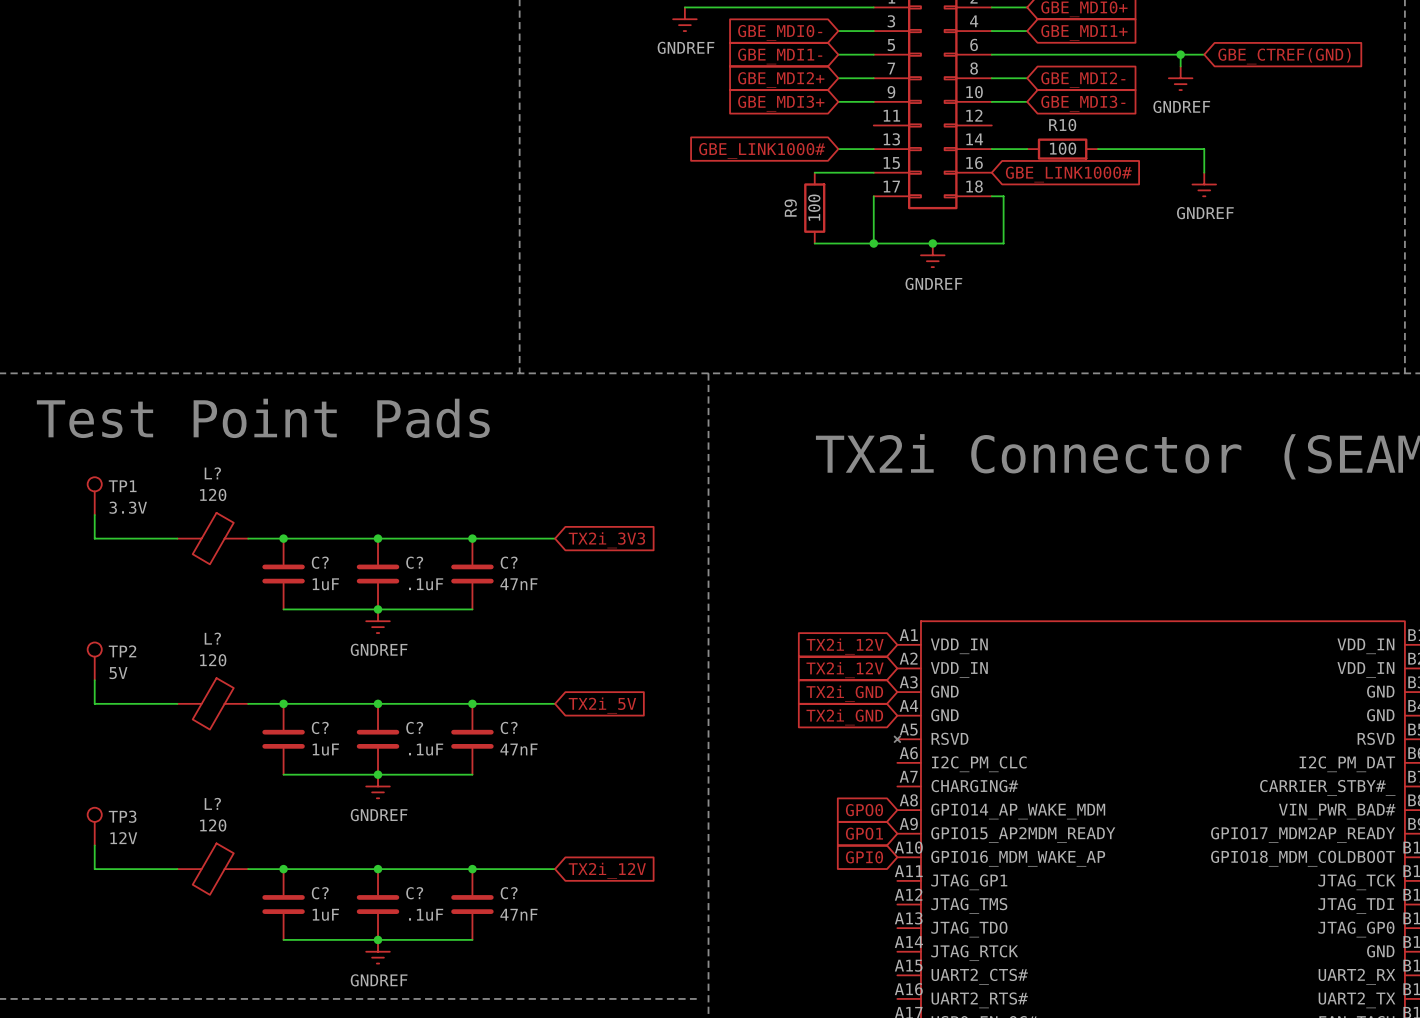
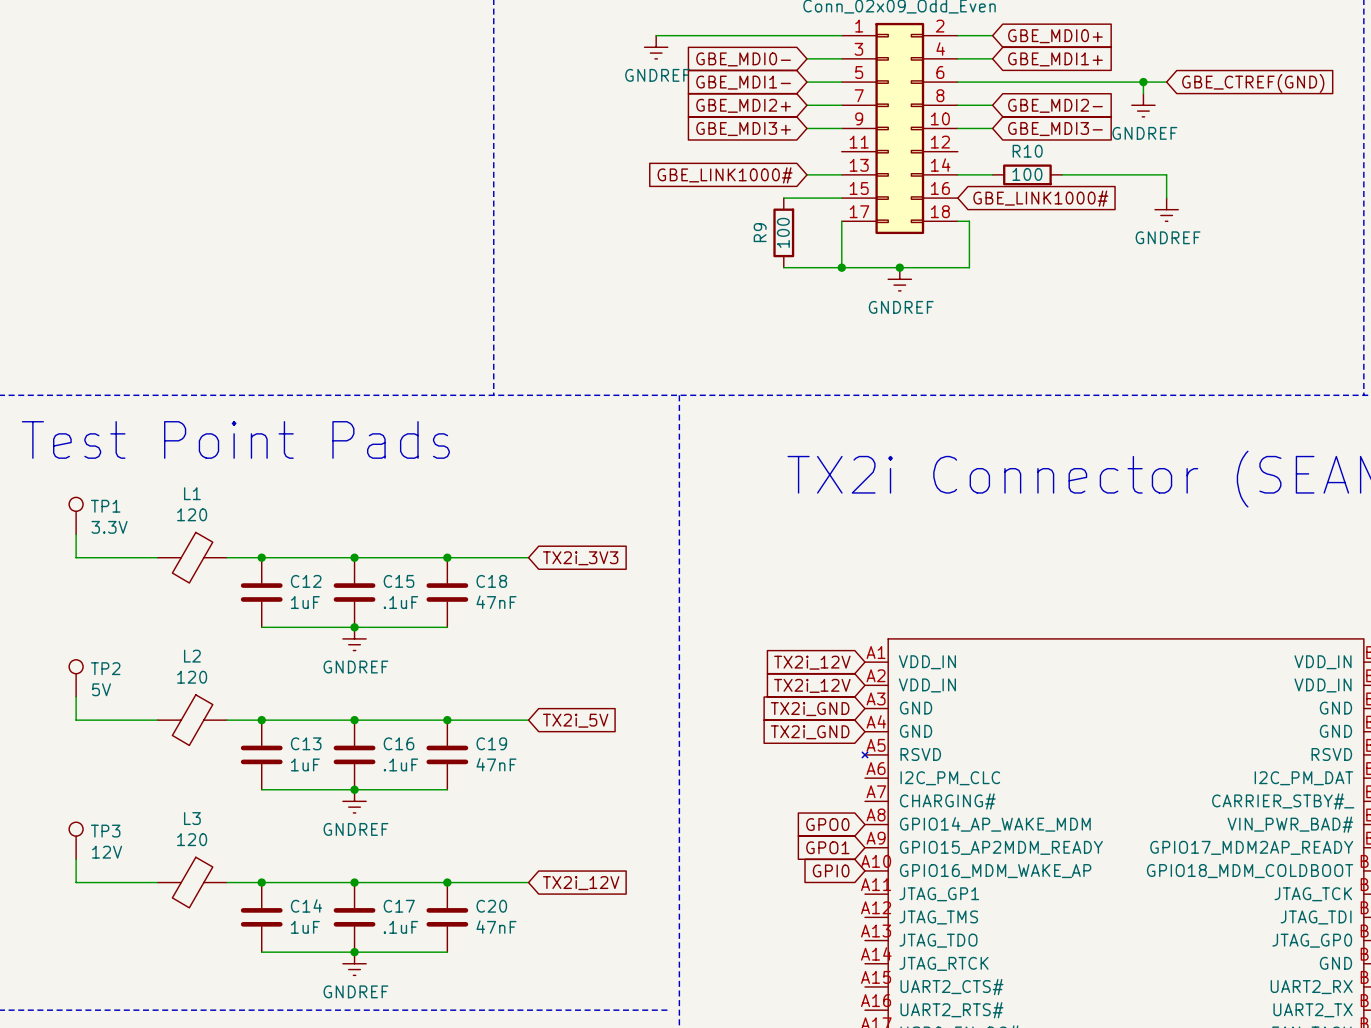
L? name: L? (212, 473) -> L1 (192, 493)
C? name: C? (320, 562) -> C12 (306, 581)
C? name: C? (414, 562) -> C15 (398, 581)
C? name: C? (509, 562) -> C18 (491, 581)
L? name: L? (212, 638) -> L2 (192, 656)
C? name: C? (320, 727) -> C13 (306, 743)
C? name: C? (414, 727) -> C16 (398, 743)
C? name: C? (509, 727) -> C19 (491, 743)
L? name: L? (212, 803) -> L3 (192, 818)
C? name: C? (320, 893) -> C14 (306, 905)
C? name: C? (414, 893) -> C17 (399, 906)
C? name: C? (509, 893) -> C20 (491, 906)

